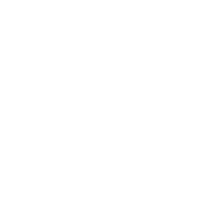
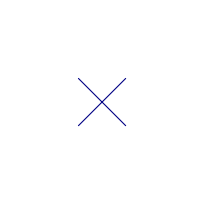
no-connect mark: none -> (102, 102)

